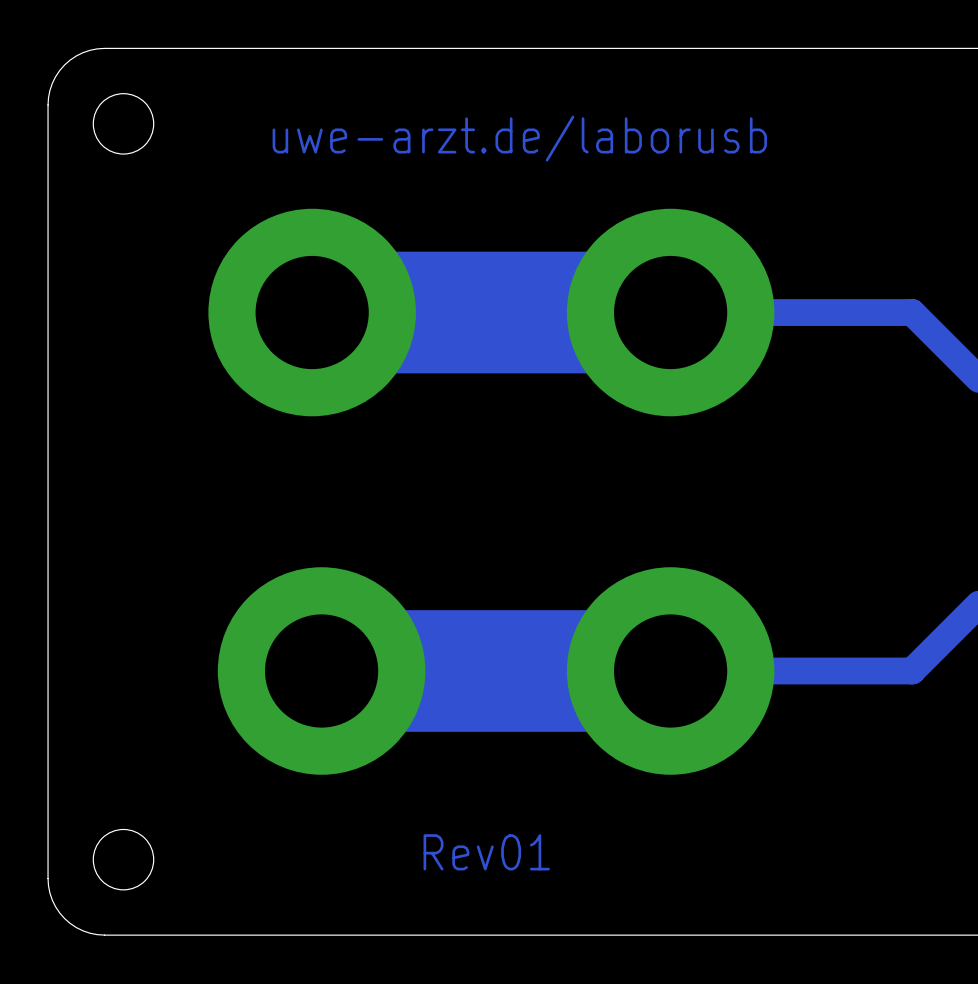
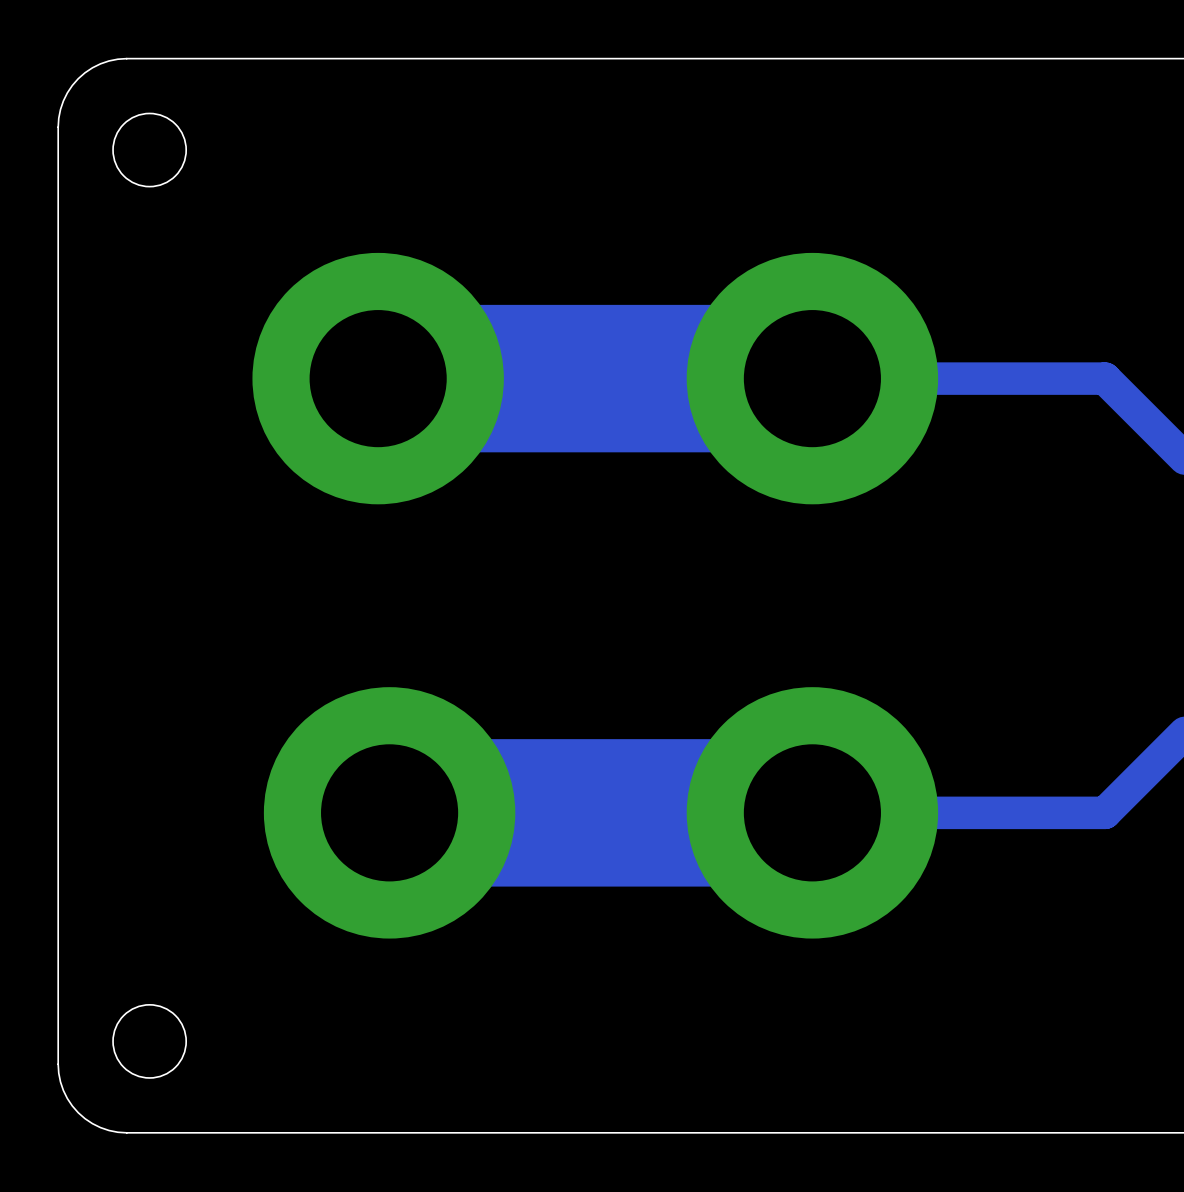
text: uwe-arzt.de/laborusb (519, 138) -> none
text: Rev01 (486, 852) -> none

